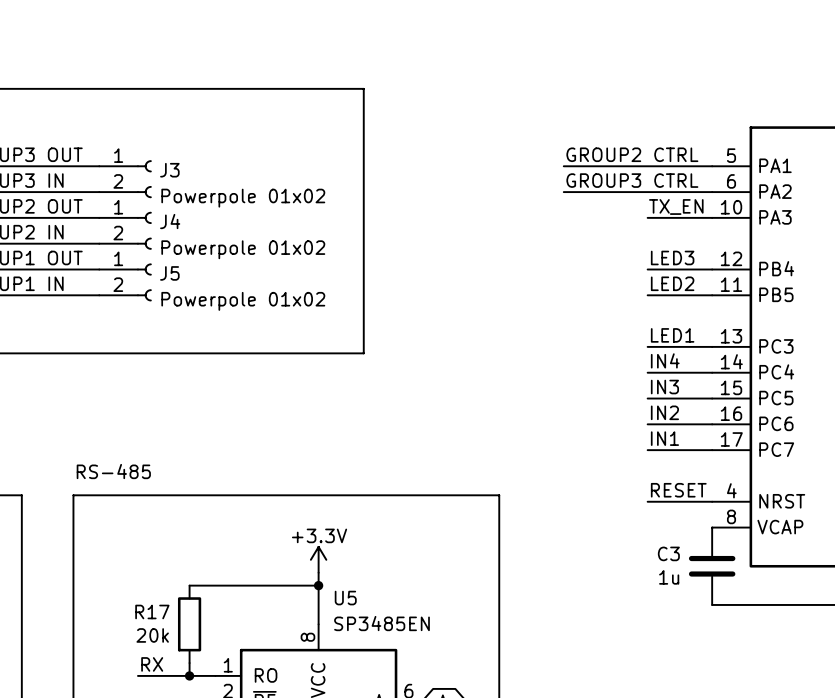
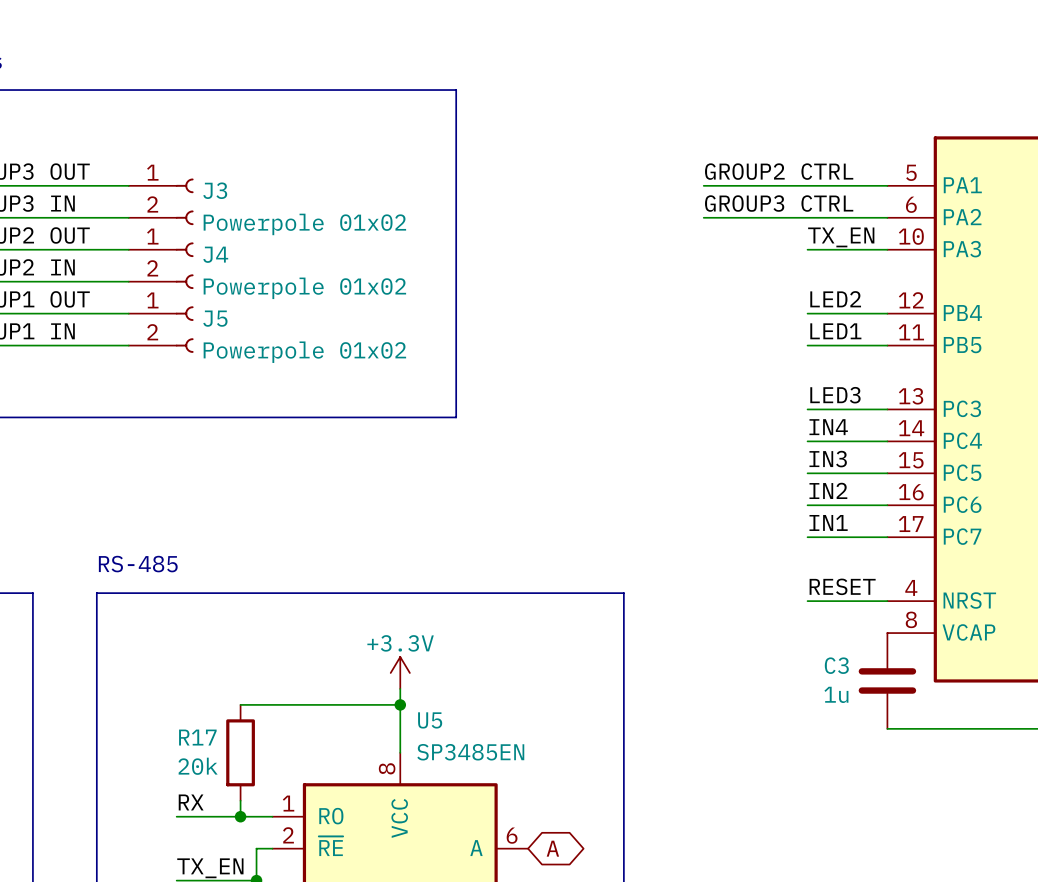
label: LED3 (672, 257) -> LED2 (835, 299)
label: LED2 (672, 283) -> LED1 (835, 331)
label: LED1 (672, 335) -> LED3 (835, 395)

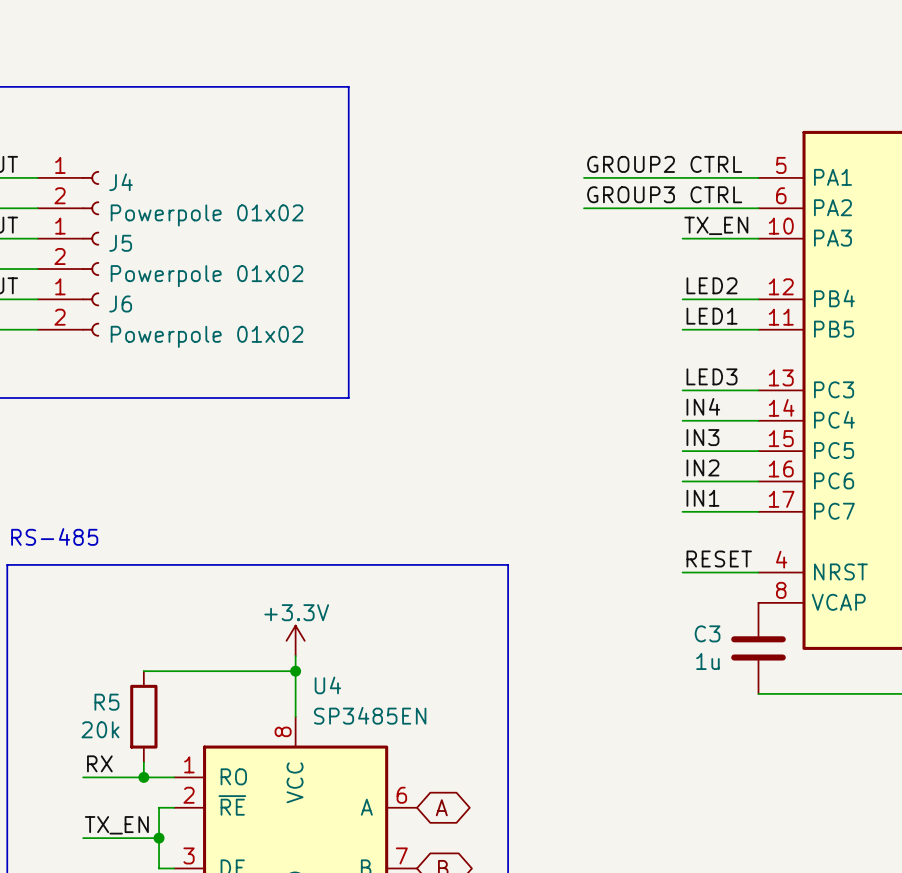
J3 name: J3 (215, 190) -> J4 (121, 182)
J4 name: J4 (215, 254) -> J5 (120, 243)
J5 name: J5 (215, 318) -> J6 (120, 303)
U5 name: U5 (430, 720) -> U4 (327, 685)
R17 name: R17 (197, 737) -> R5 (106, 702)

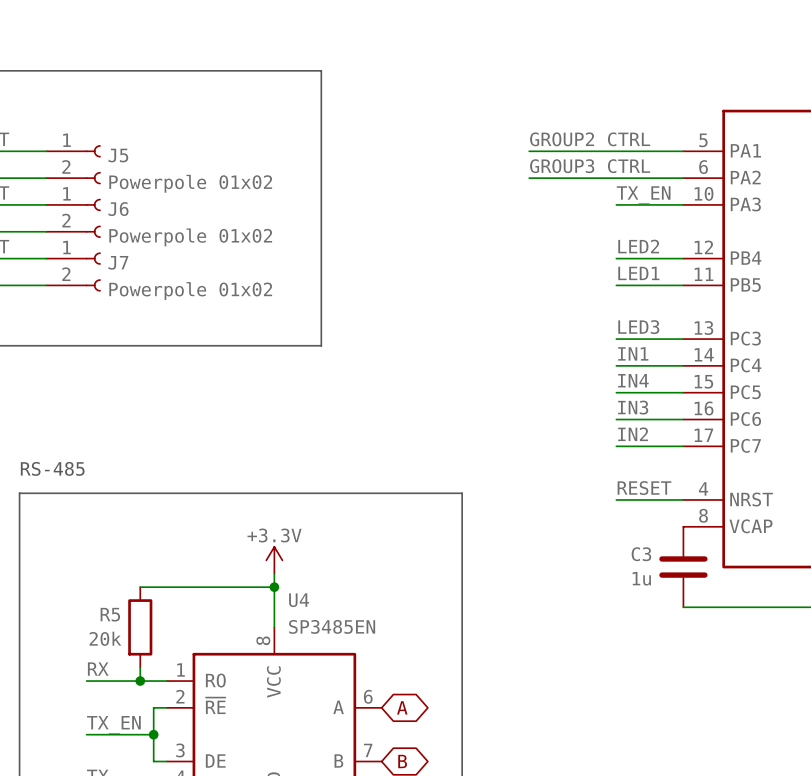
J4 name: J4 (121, 182) -> J5 (118, 155)
J5 name: J5 (120, 243) -> J6 (118, 209)
J6 name: J6 (120, 303) -> J7 (118, 262)
label: IN4 (703, 406) -> IN1 (633, 353)
label: IN3 (702, 437) -> IN4 (633, 380)
label: IN2 (702, 467) -> IN3 (633, 407)
label: IN1 (702, 498) -> IN2 (633, 434)

